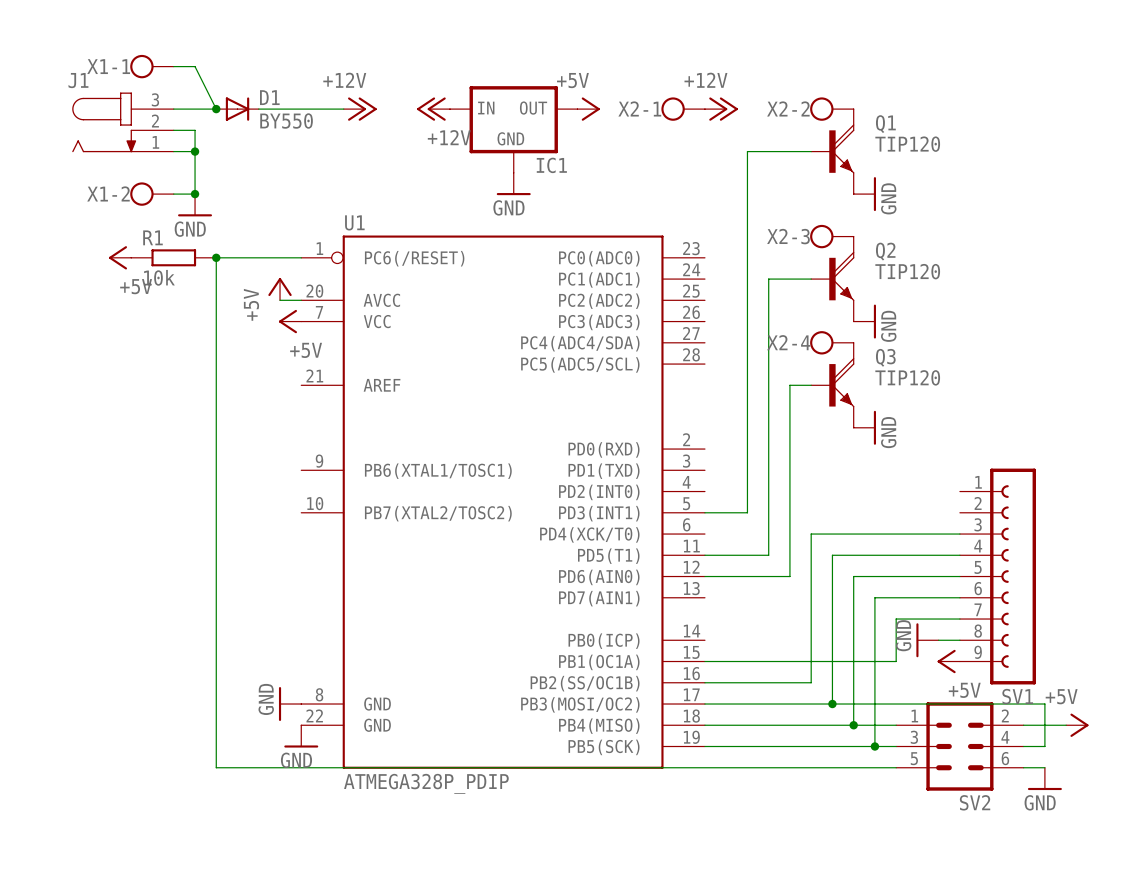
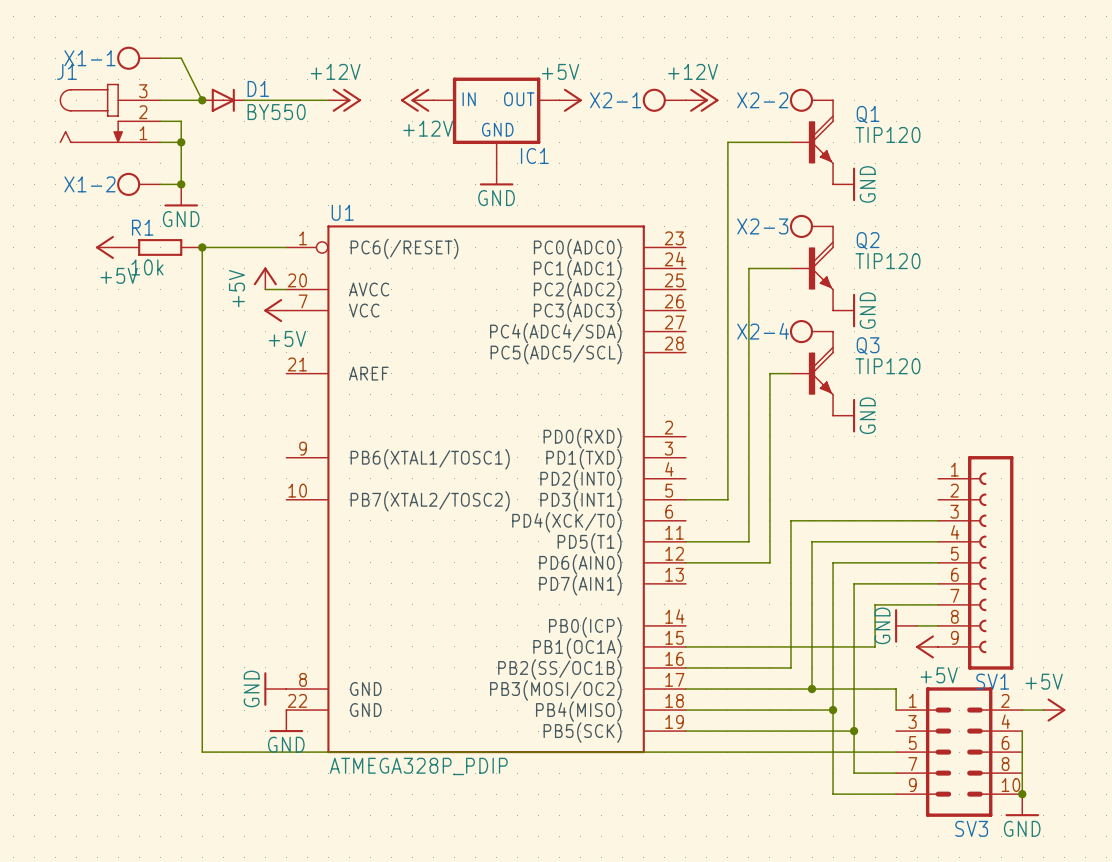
wire: (917, 704) (1044, 704) (1044, 746) (1023, 746) -> (896, 689) (896, 710)
wire: (853, 725) (896, 725) -> (833, 710) (833, 794) (896, 794)
wire: (874, 746) (896, 746) -> (854, 731) (854, 773) (896, 773)
SV2: (959, 746) -> none
wire: none -> (1022, 731) (1022, 794)
SV3: none -> (959, 752)
power symbol position: GND (1044, 778) -> GND (1022, 805)
junction: none -> (1022, 794)

